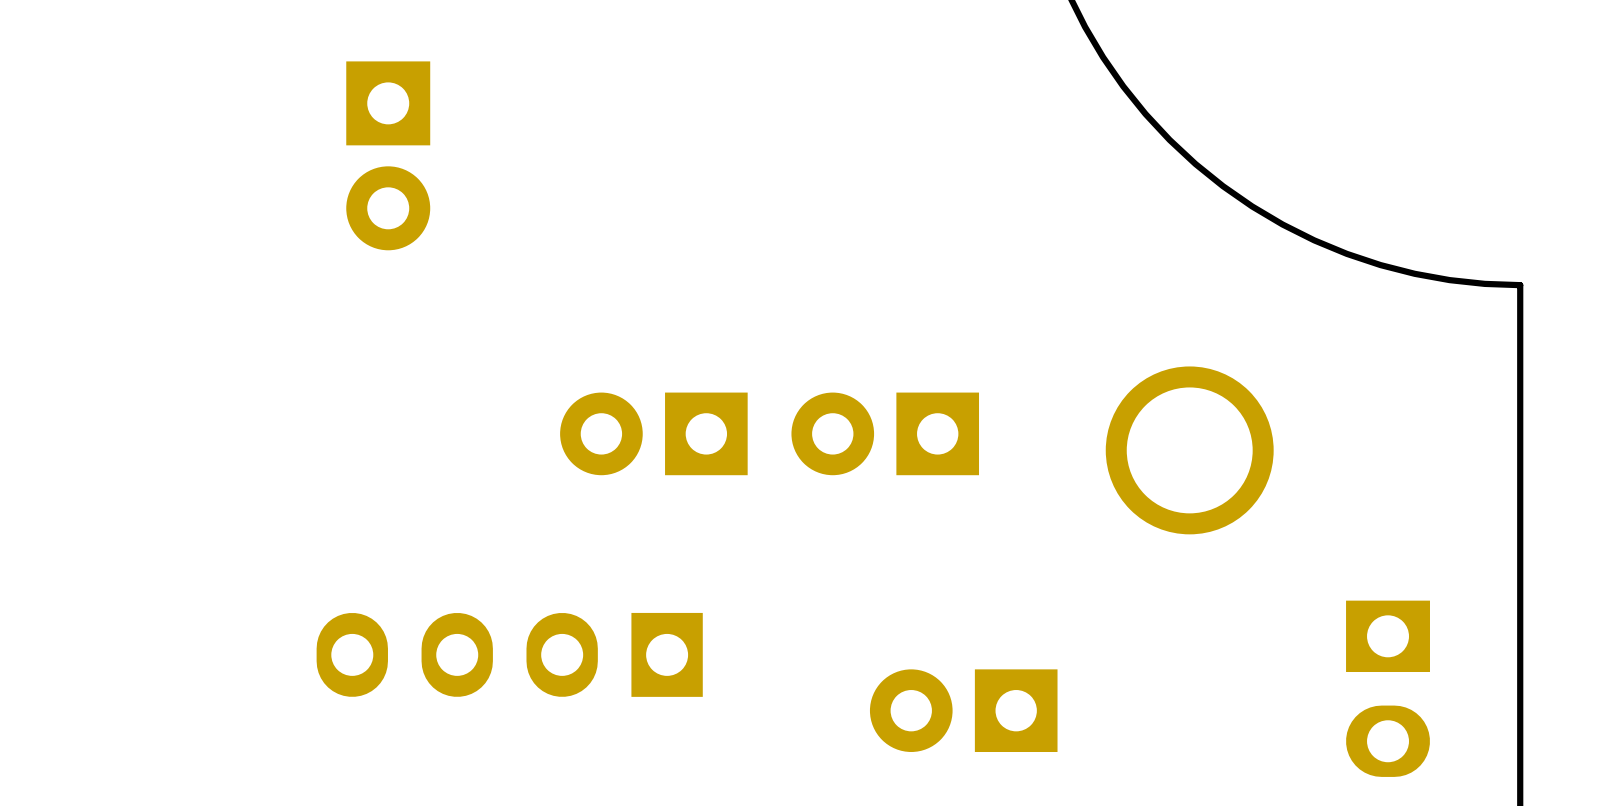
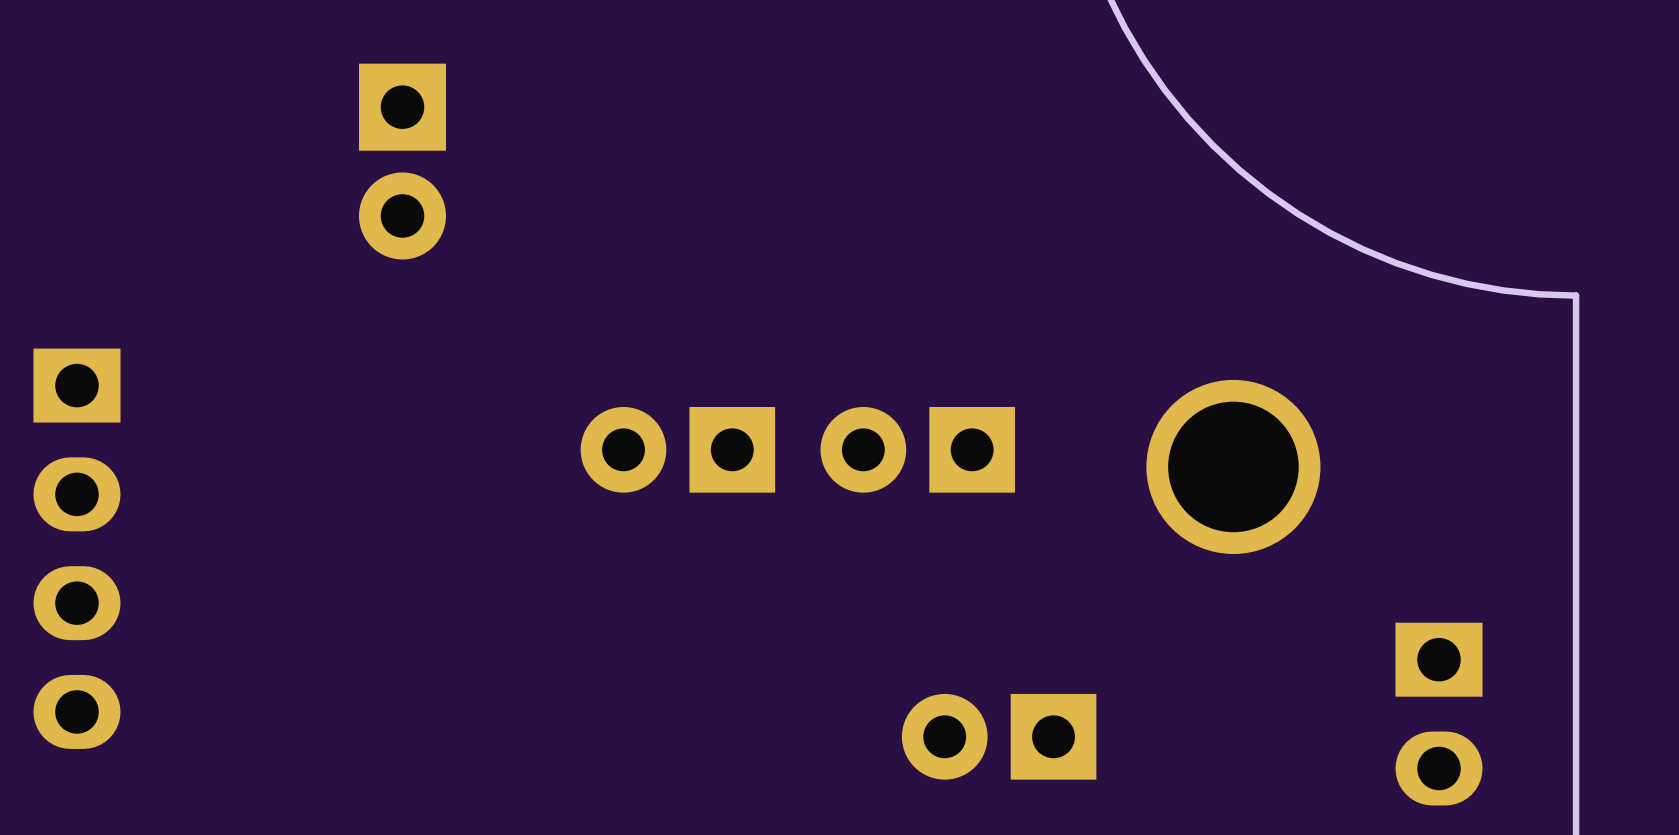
part rotation: 0° (509, 654) -> 90° counterclockwise (76, 548)
part position: (509, 654) -> (76, 548)

